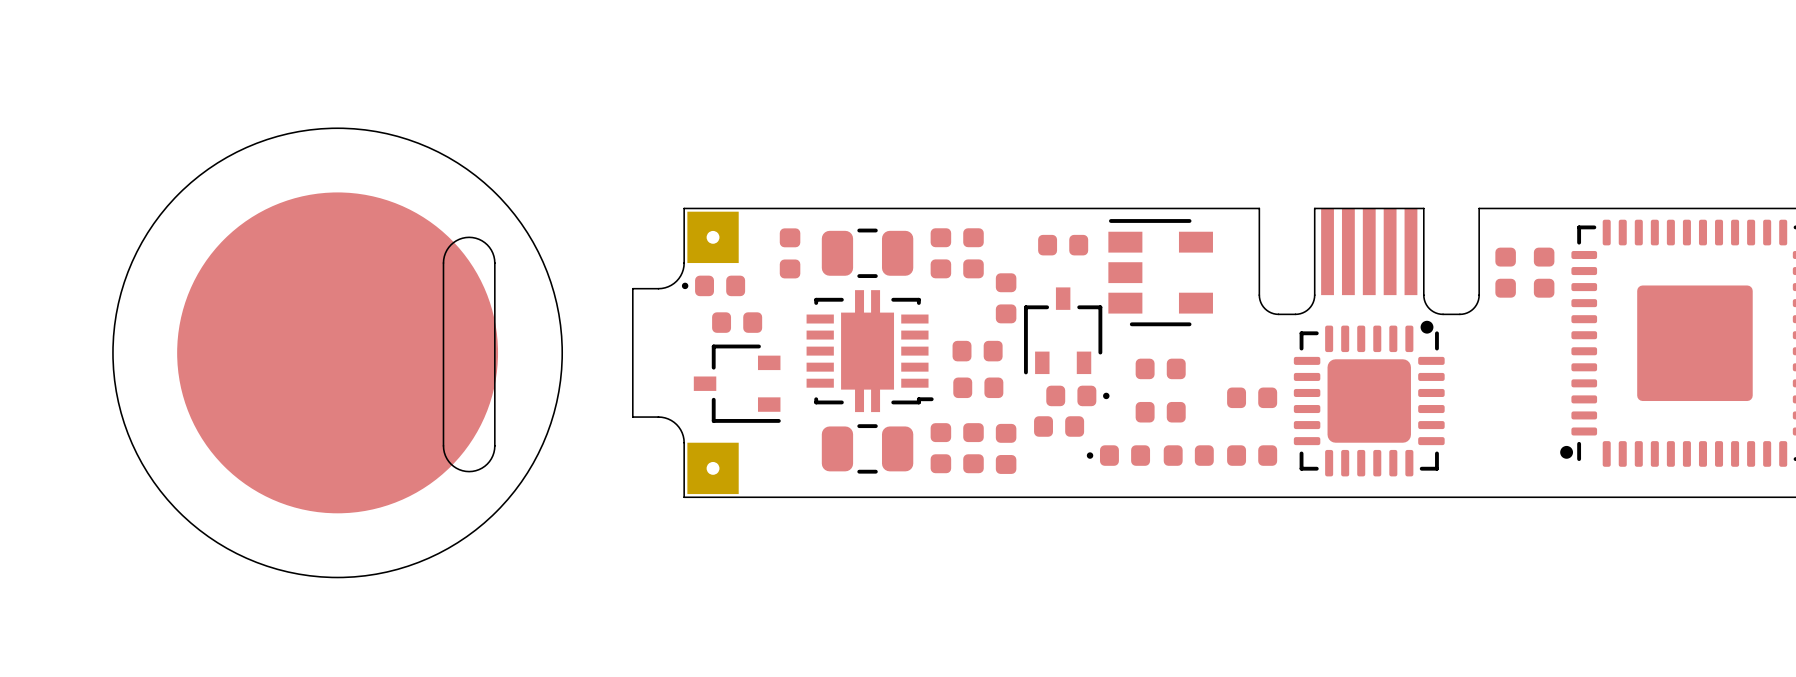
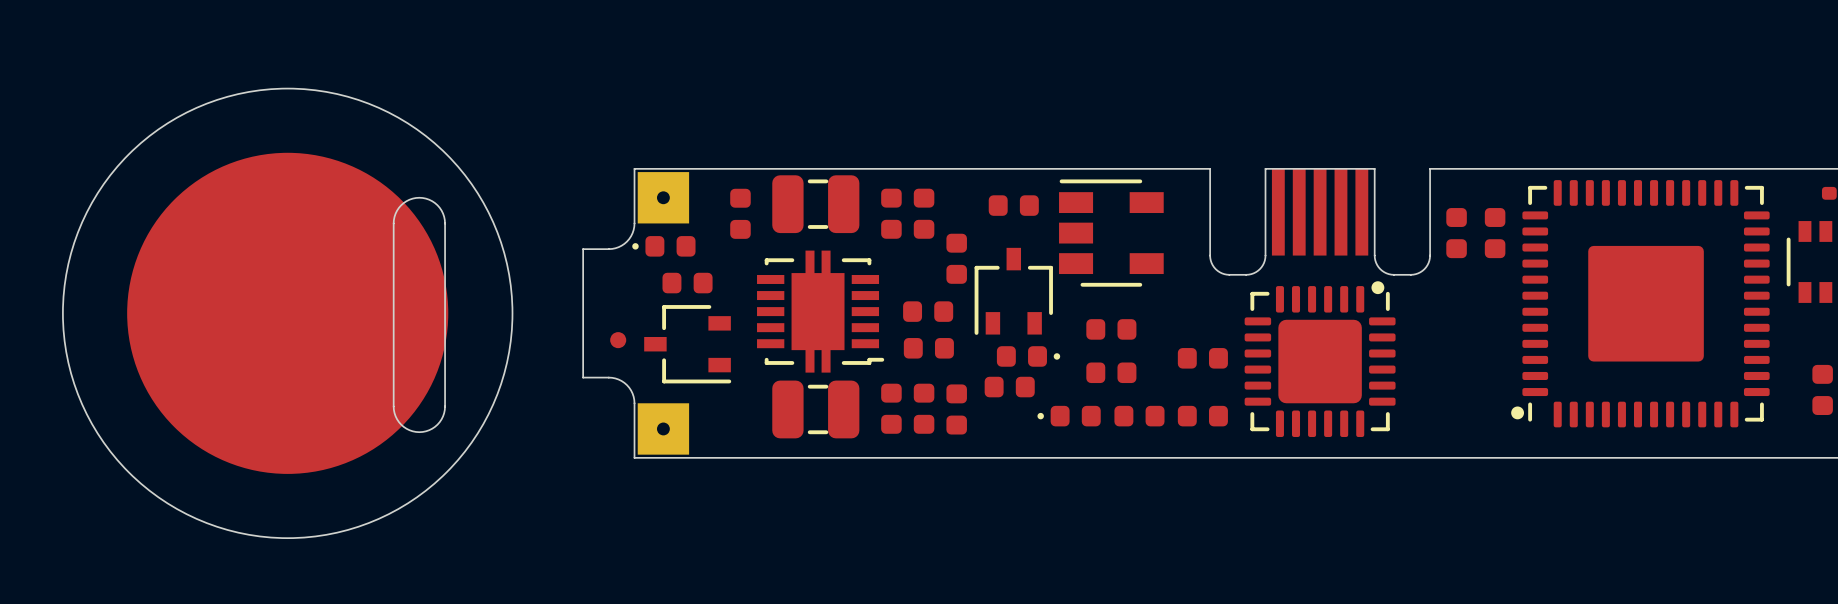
part footprint: [821, 228, 914, 279] -> [772, 175, 860, 234]
part: none -> (618, 340)
part footprint: [821, 424, 914, 474] -> [772, 380, 860, 439]

